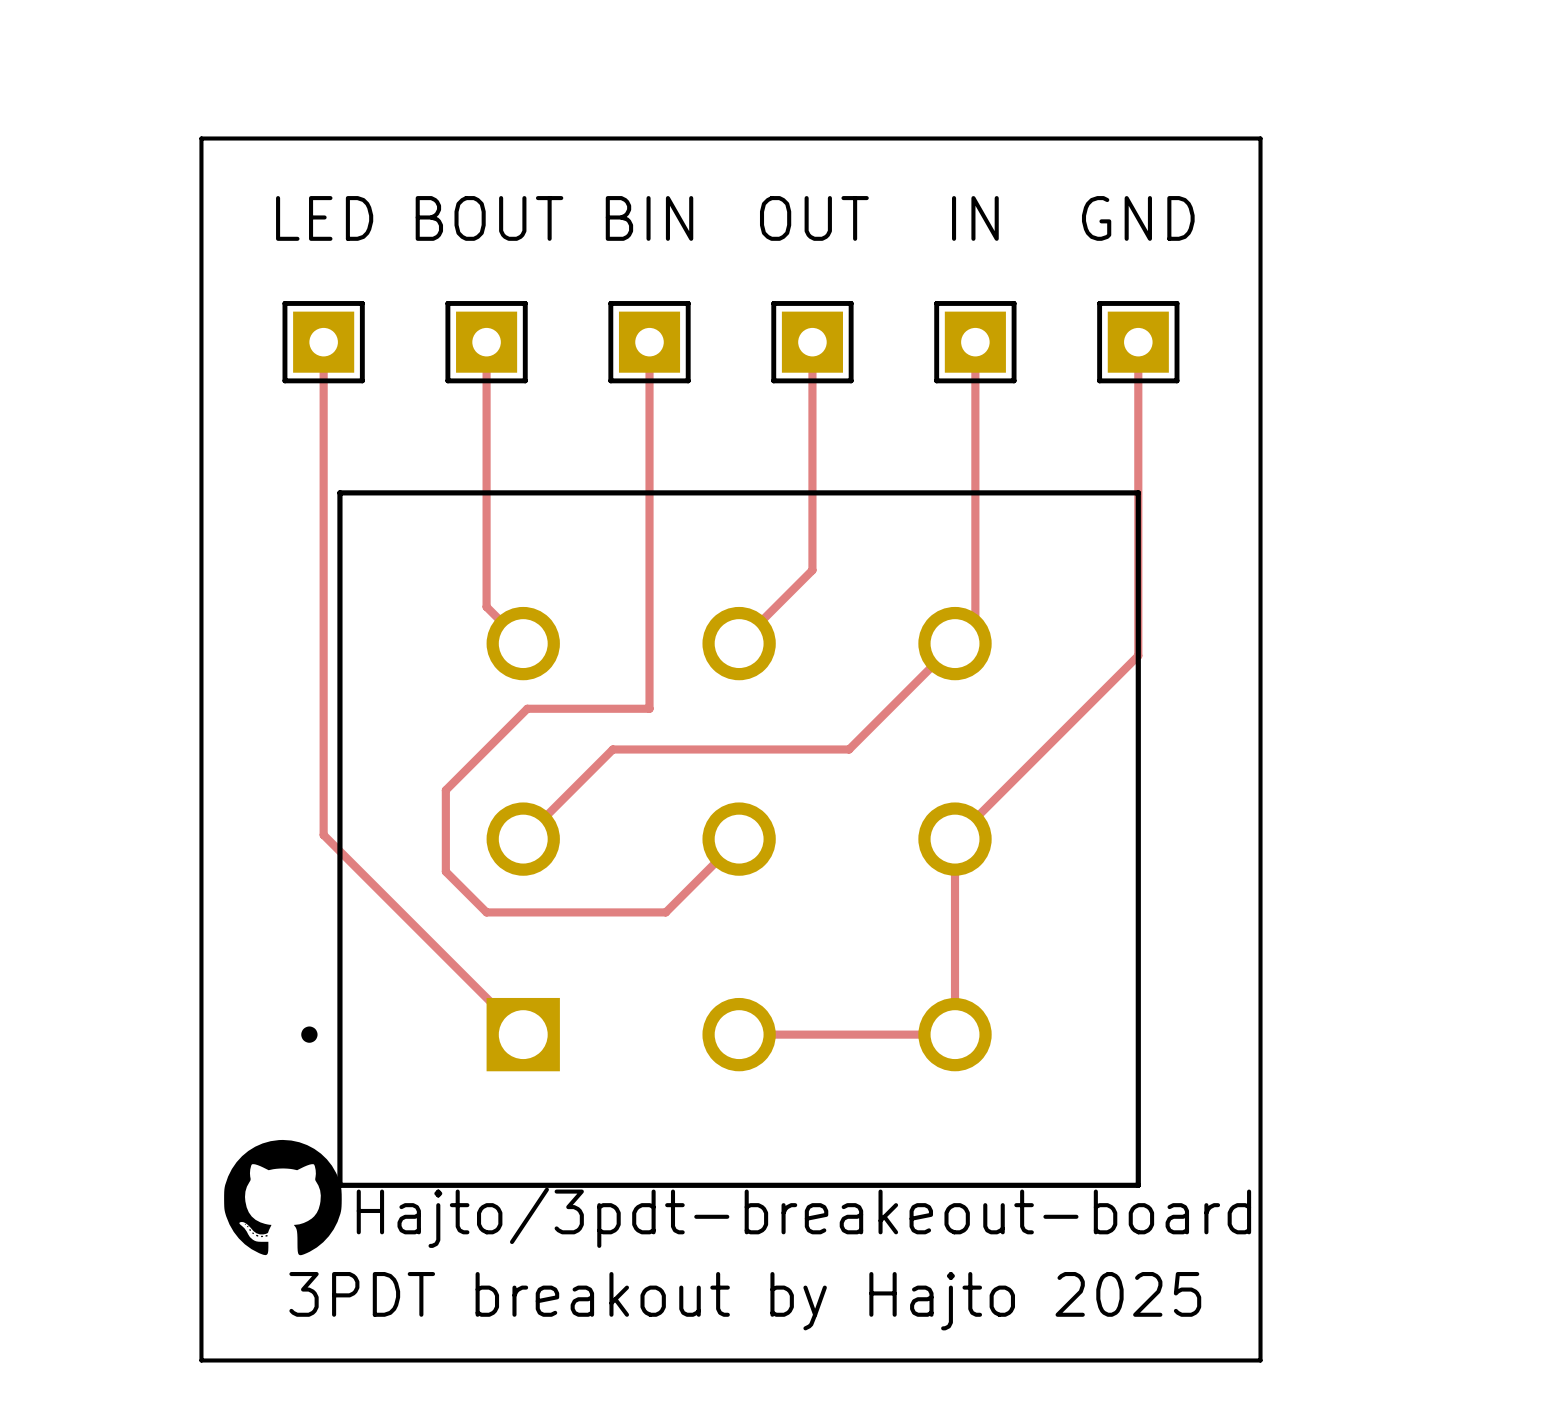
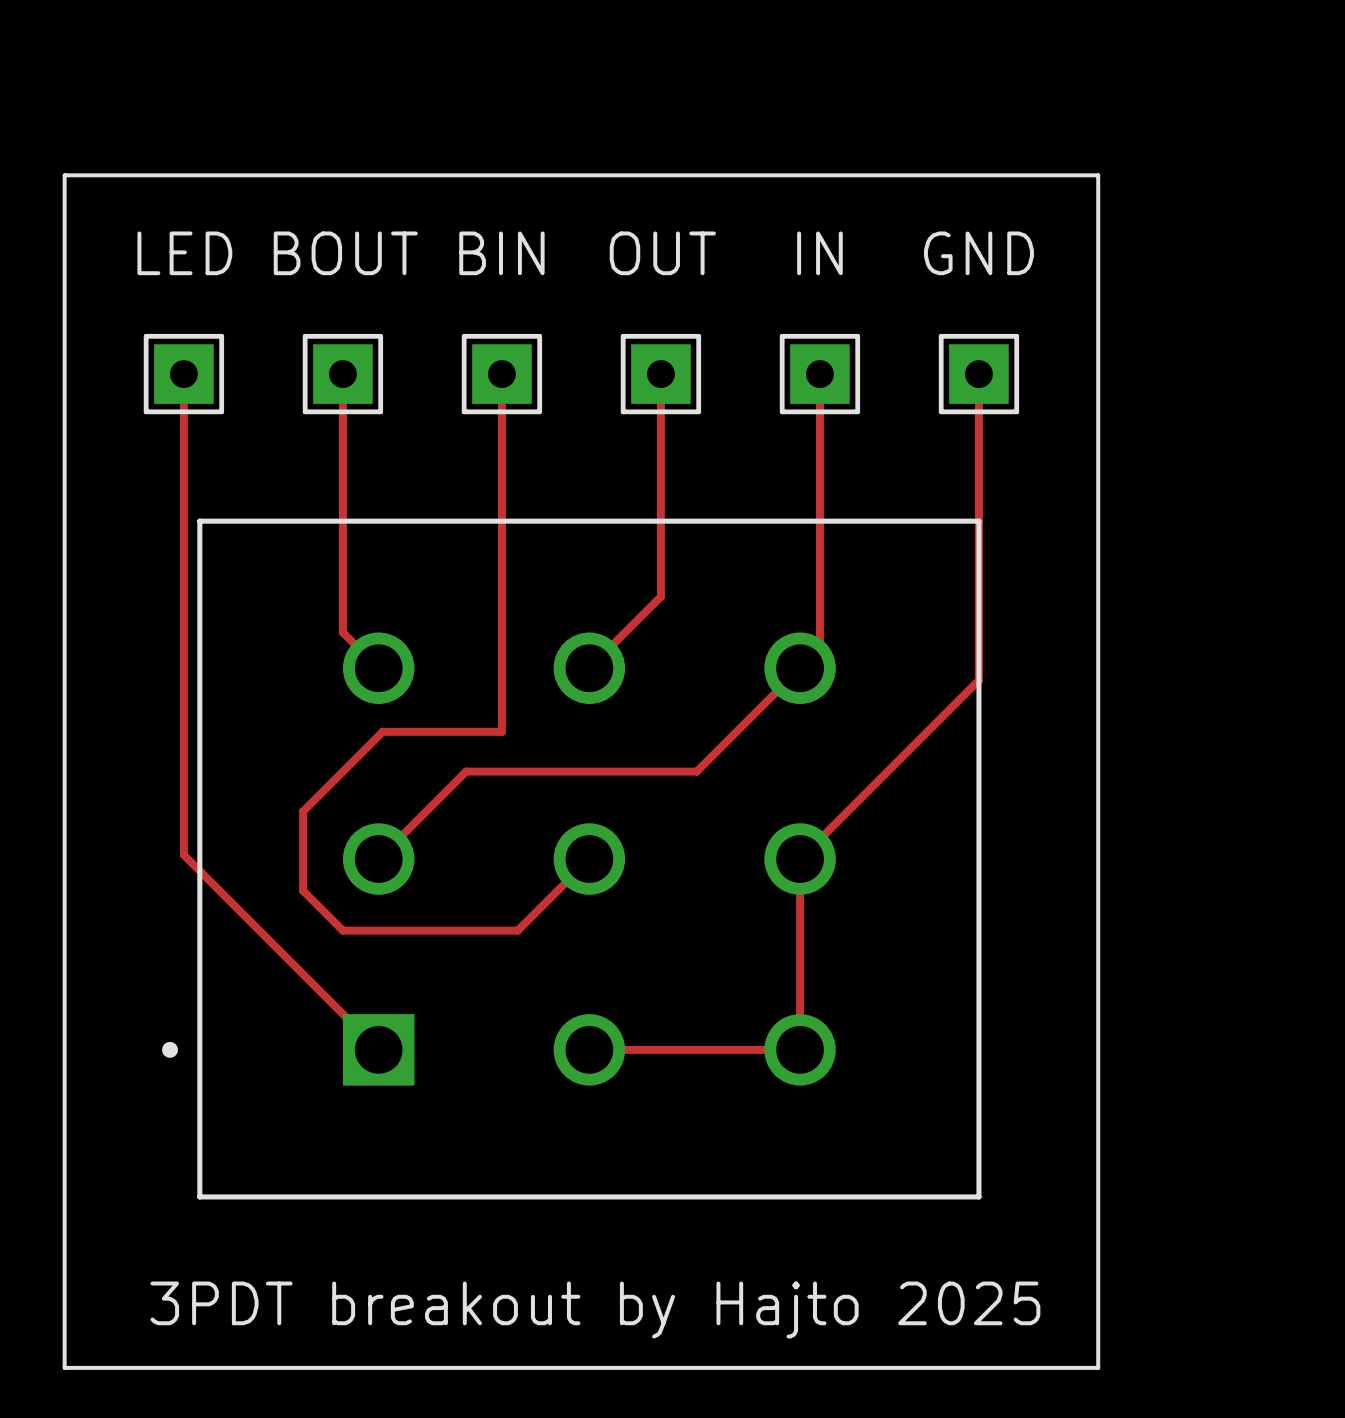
drawing: [224, 1139, 342, 1256] -> none
text: Hajto/3pdt-breakeout-board (803, 1217) -> none

